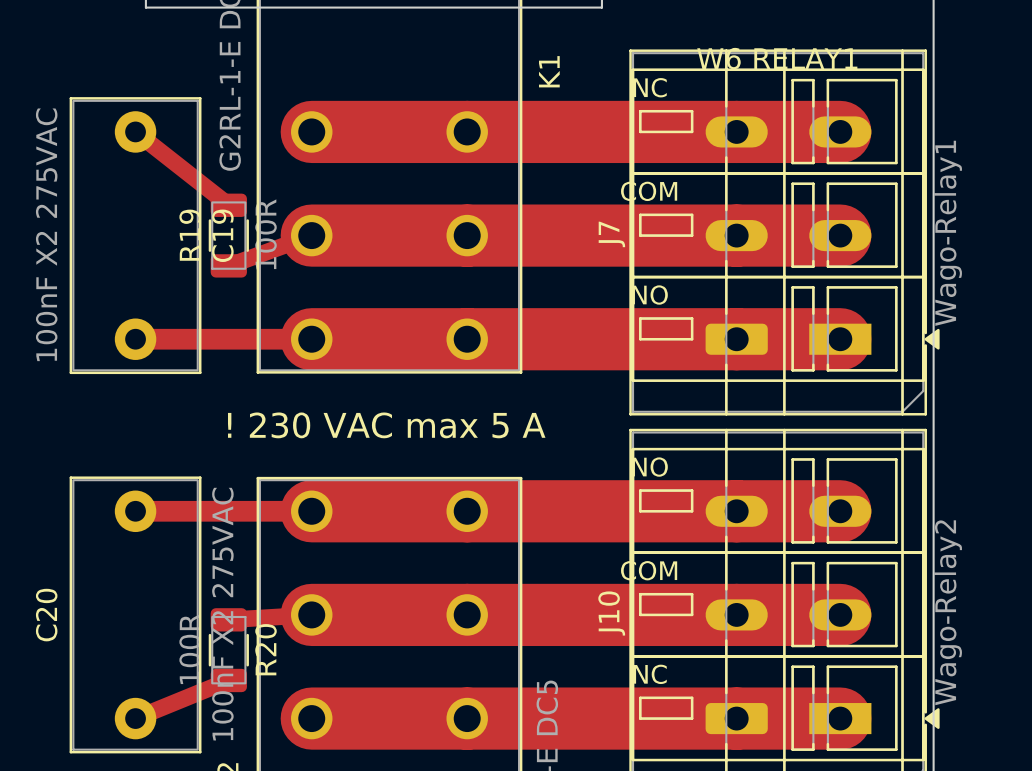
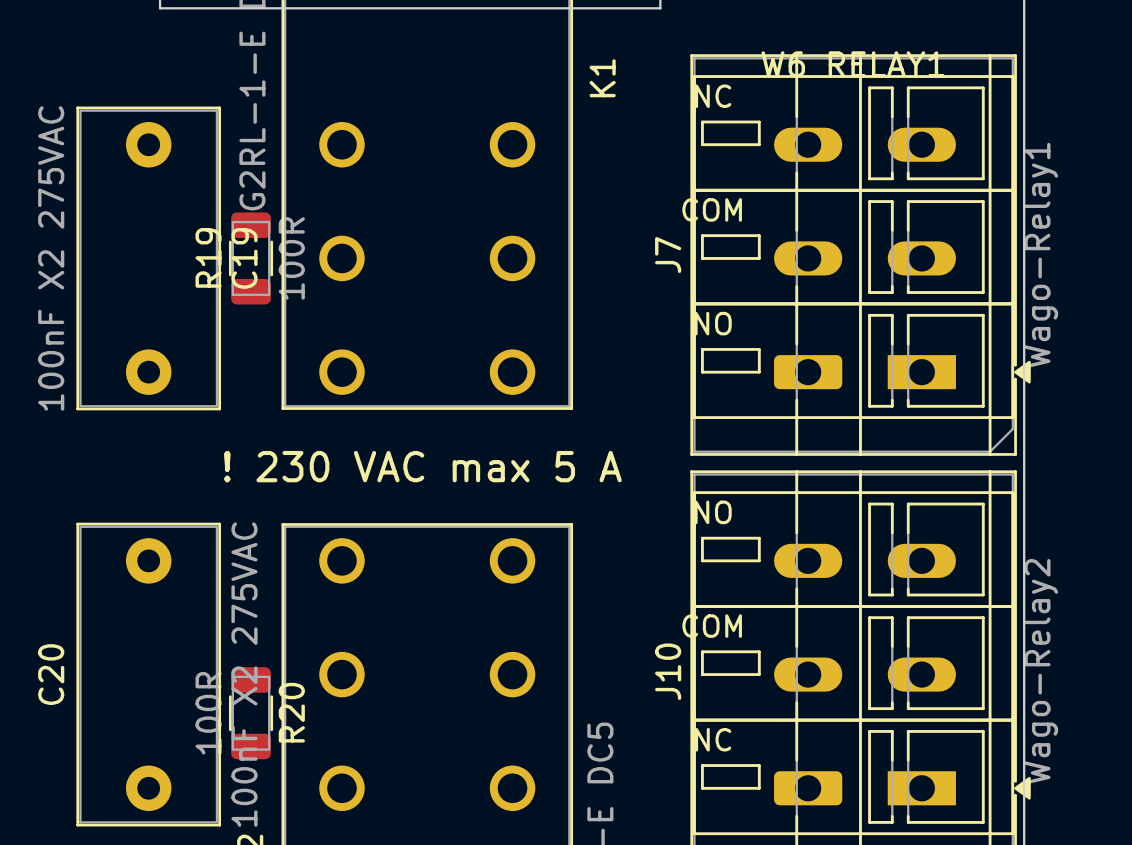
track: (135, 131) (228, 205) -> none
track: (311, 131) (840, 131) -> none
track: (840, 235) (311, 235) (228, 265) -> none
track: (135, 339) (840, 339) -> none
track: (135, 511) (840, 511) -> none
track: (840, 614) (311, 614) (228, 619) -> none
track: (228, 680) (135, 718) -> none
track: (311, 718) (840, 718) -> none

